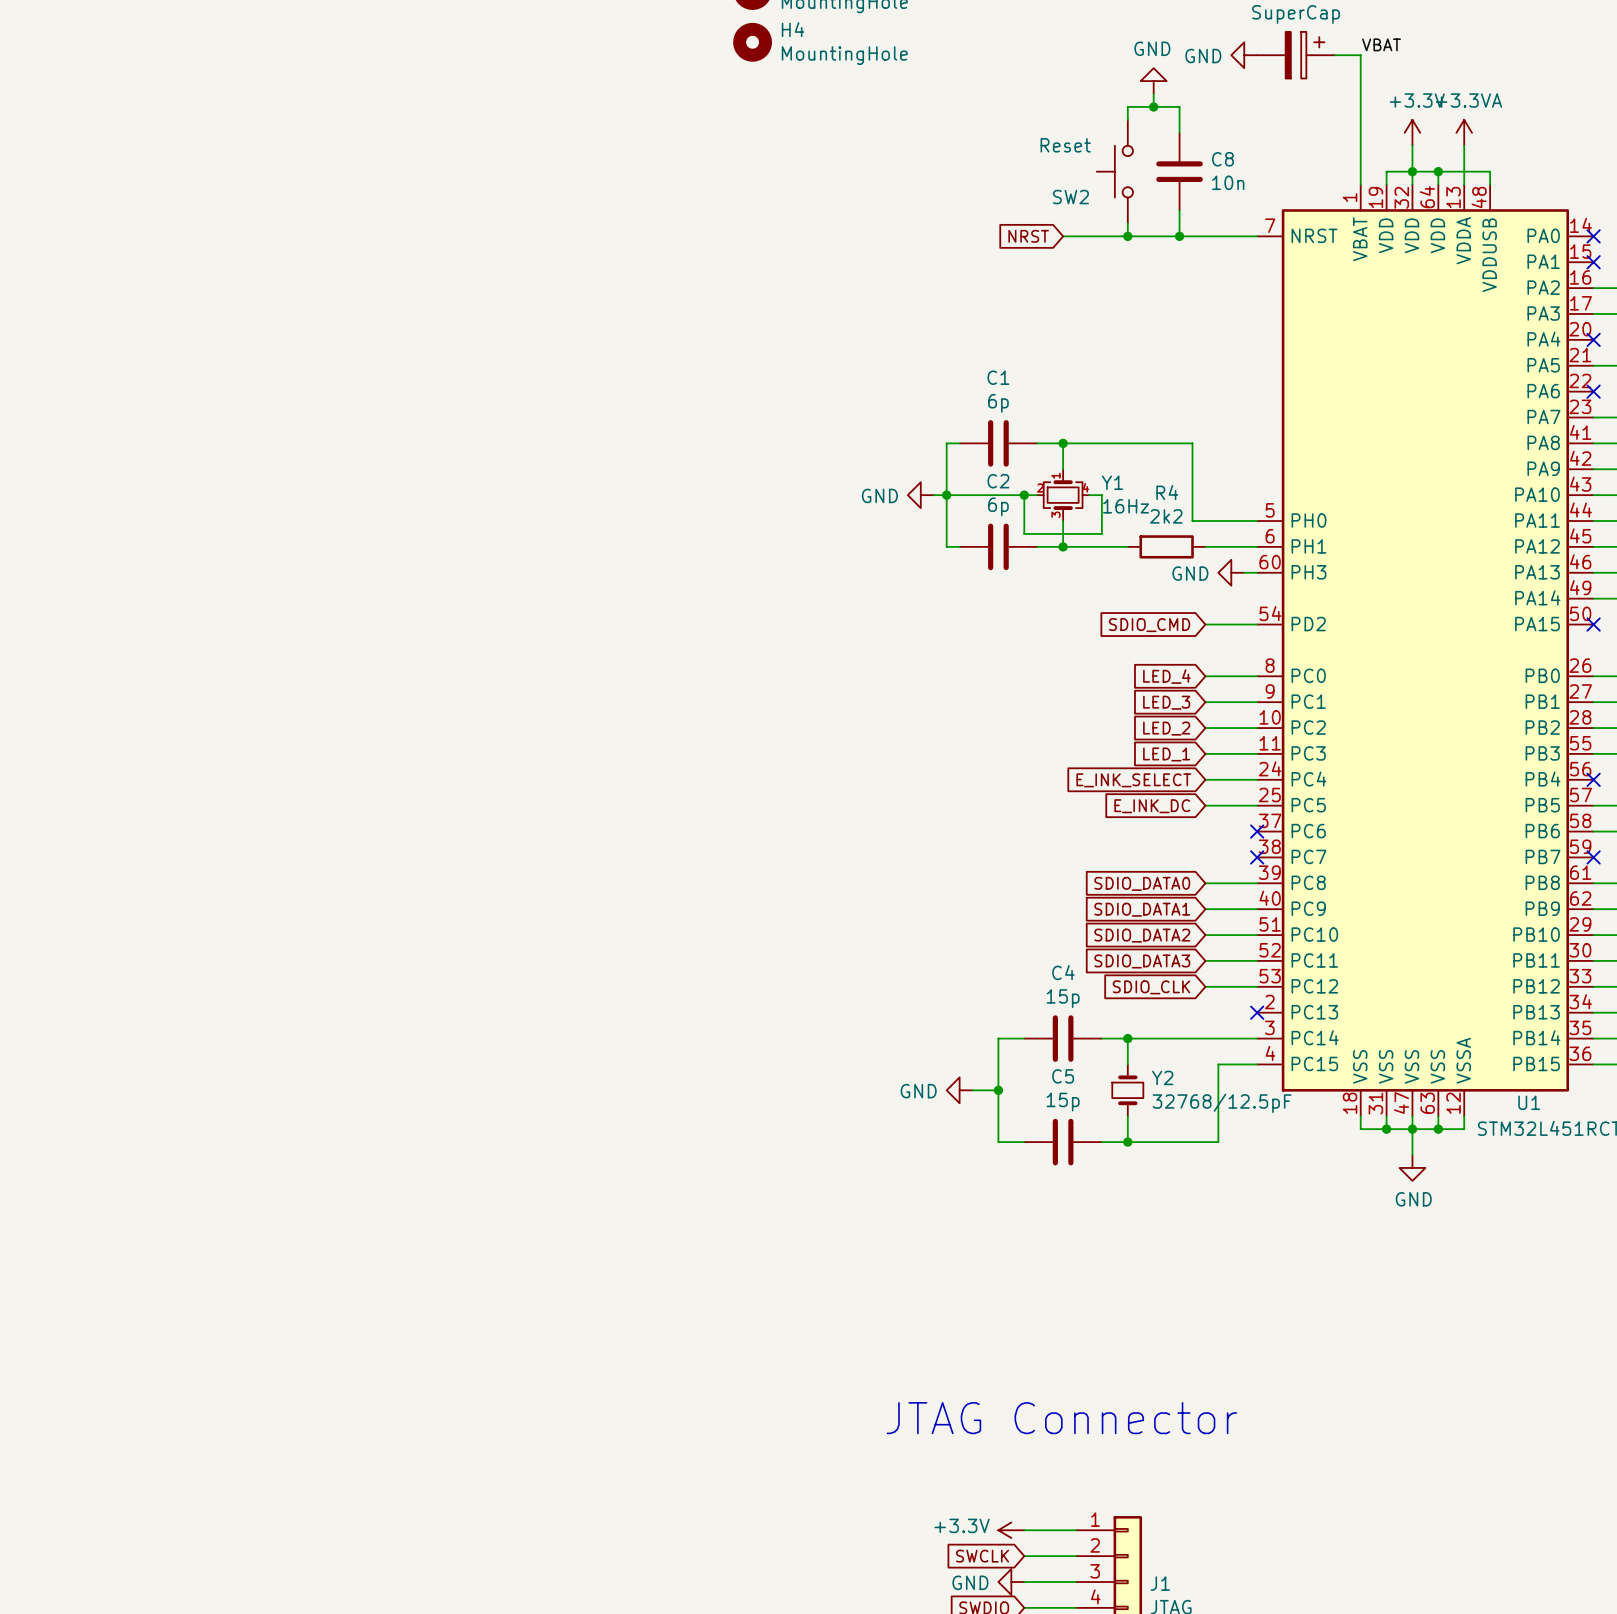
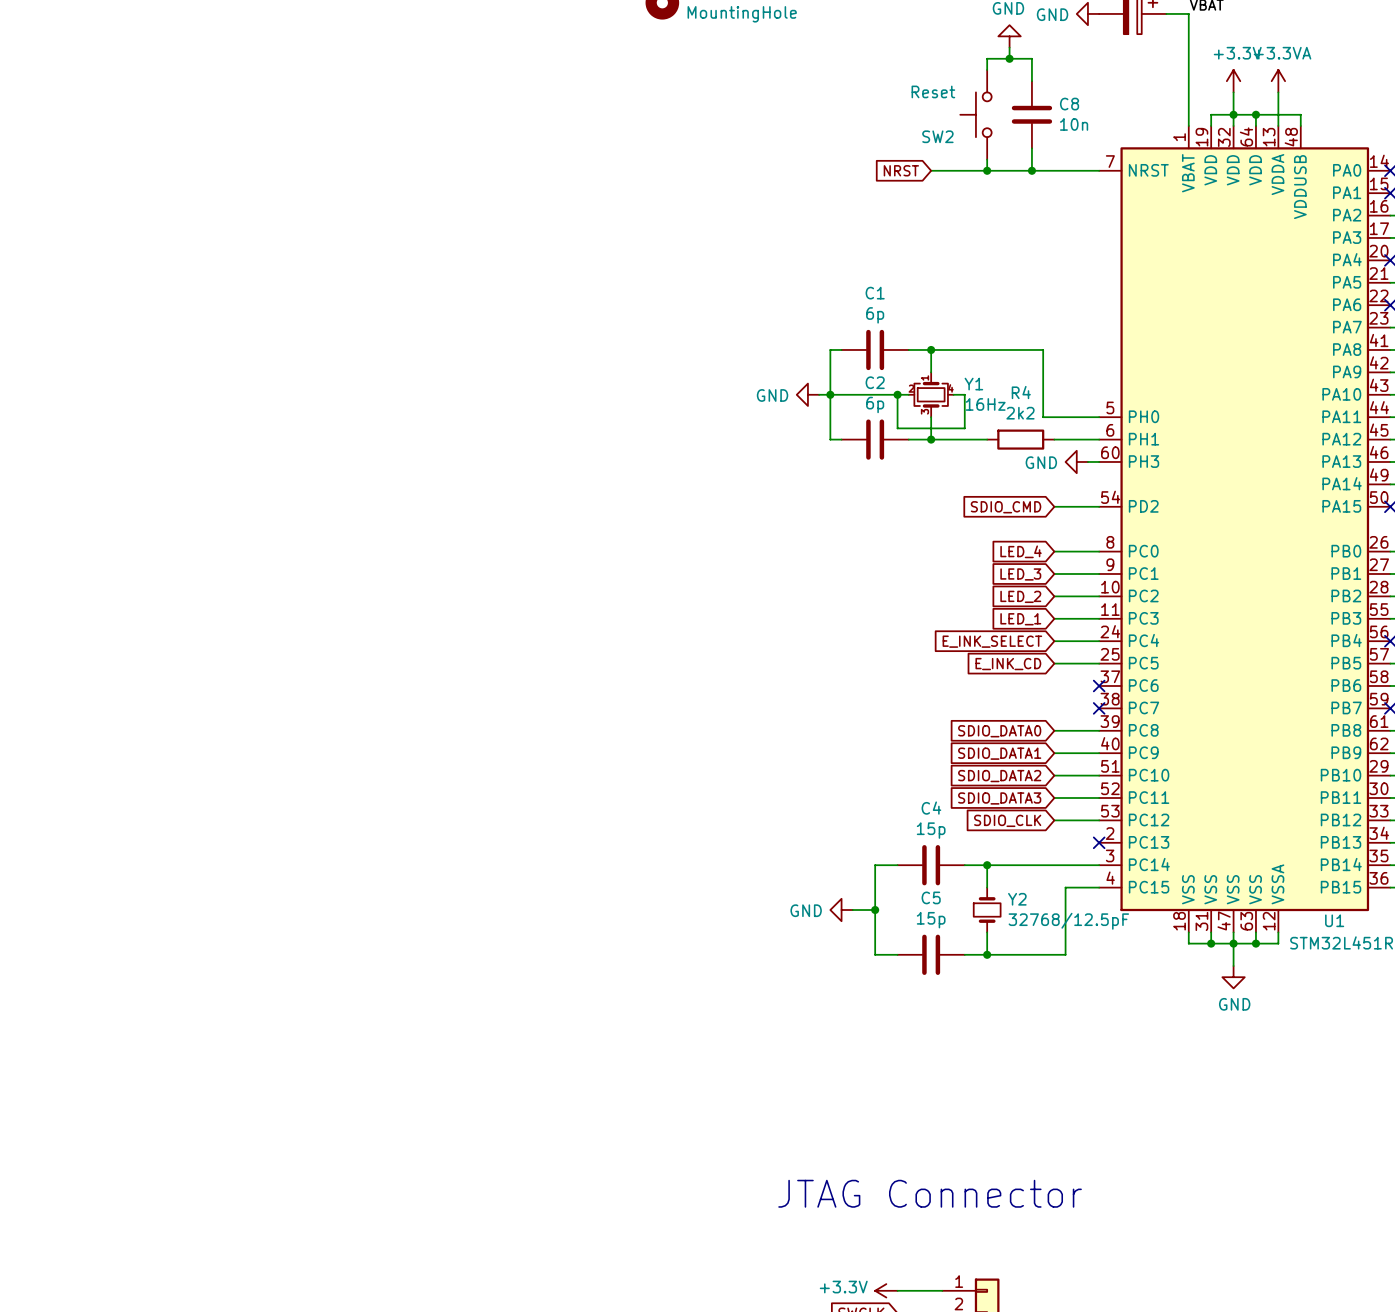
global label: E_INK_DC (1152, 806) -> E_INK_CD (1008, 664)

